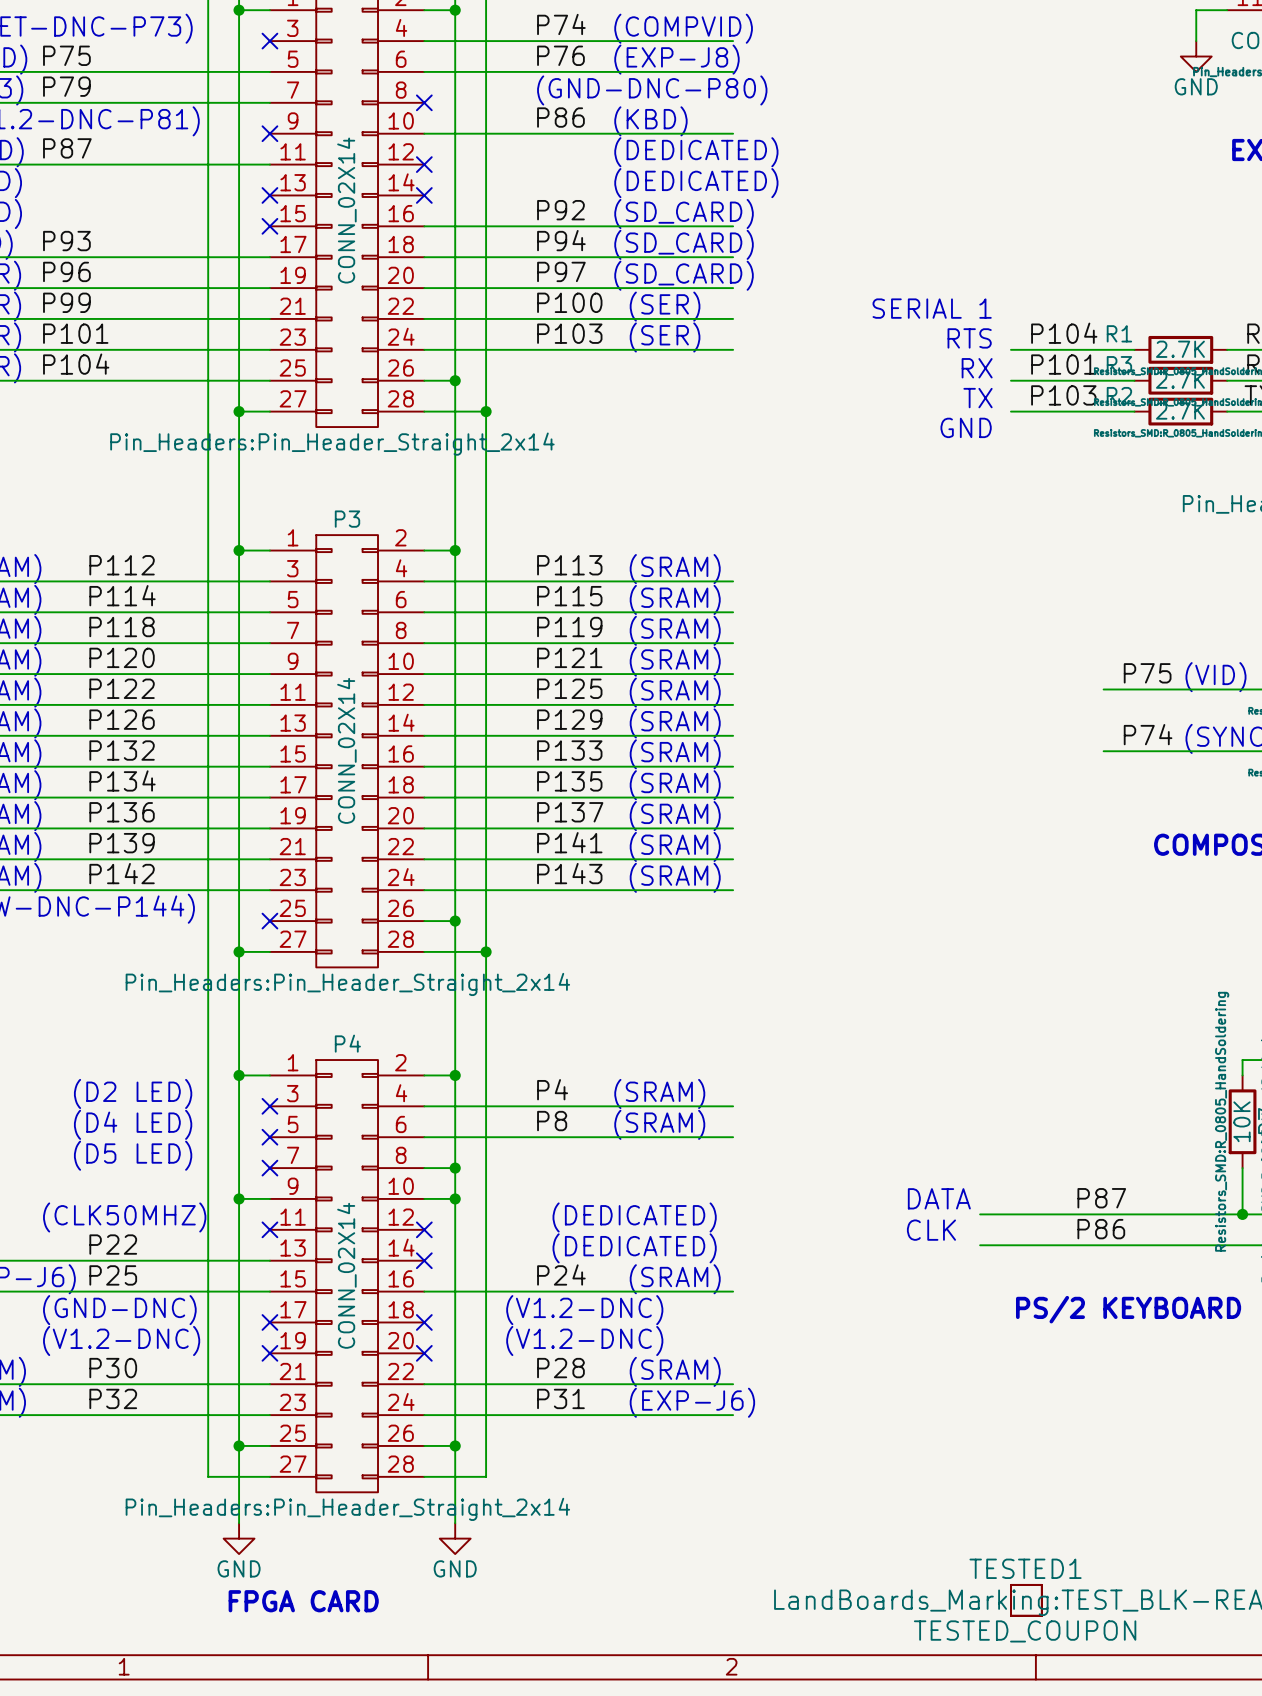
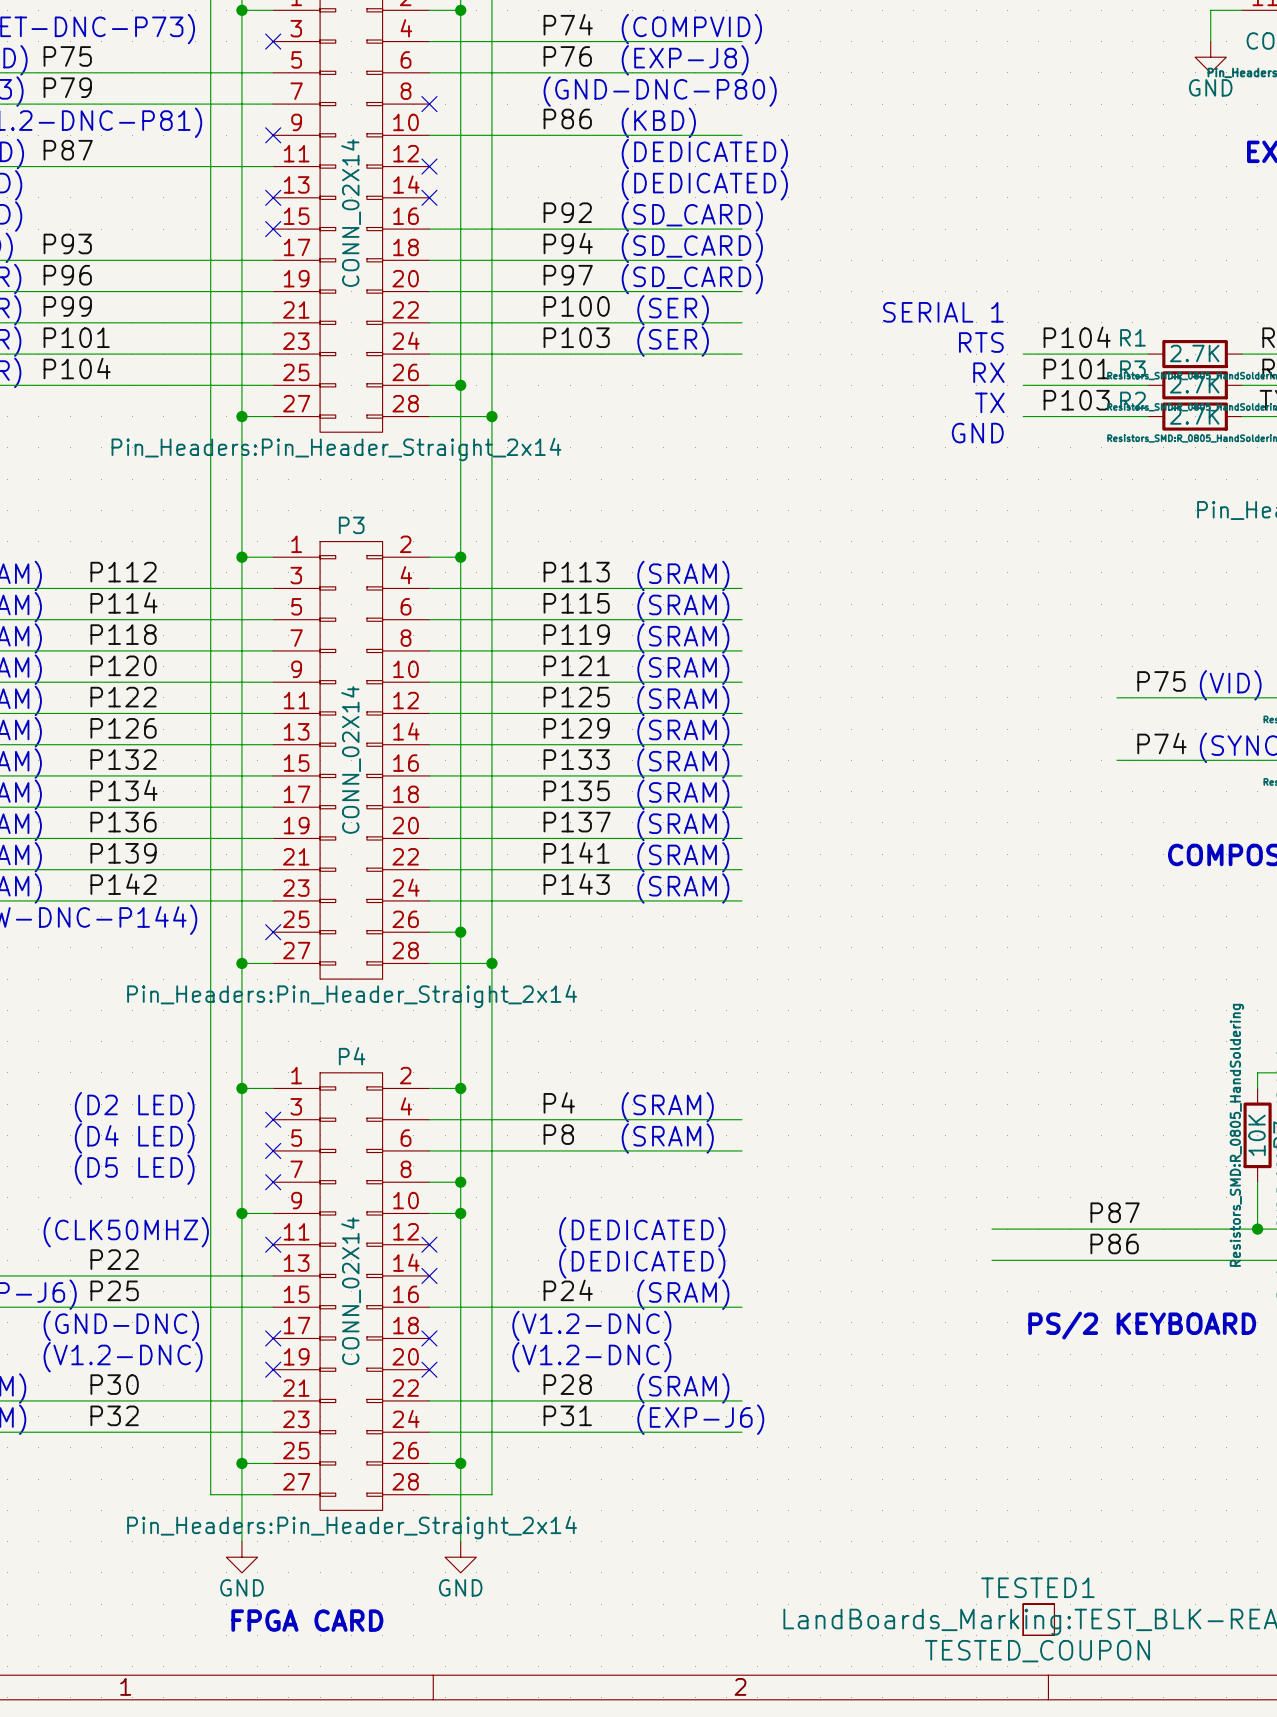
text: DATA (939, 1198) -> none
text: CLK (931, 1230) -> none

